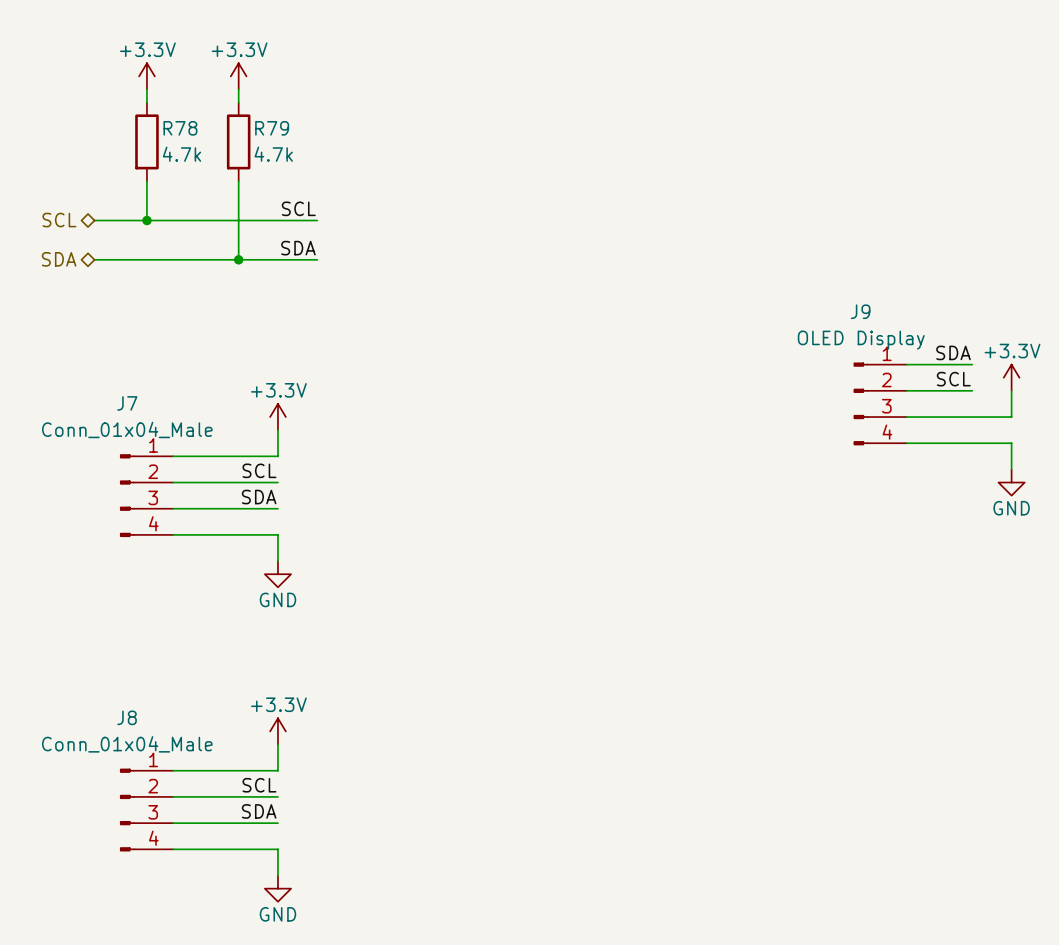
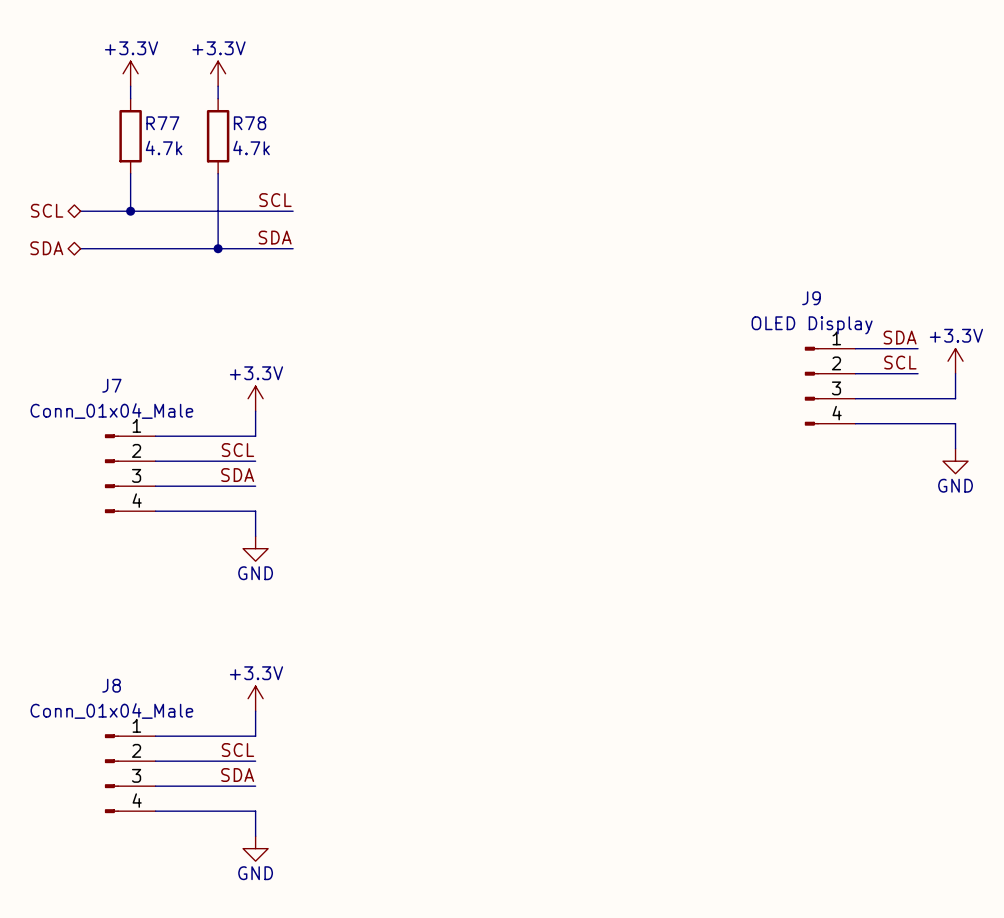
R78 name: R78 (180, 128) -> R77 (162, 123)
R79 name: R79 (272, 128) -> R78 (250, 123)

